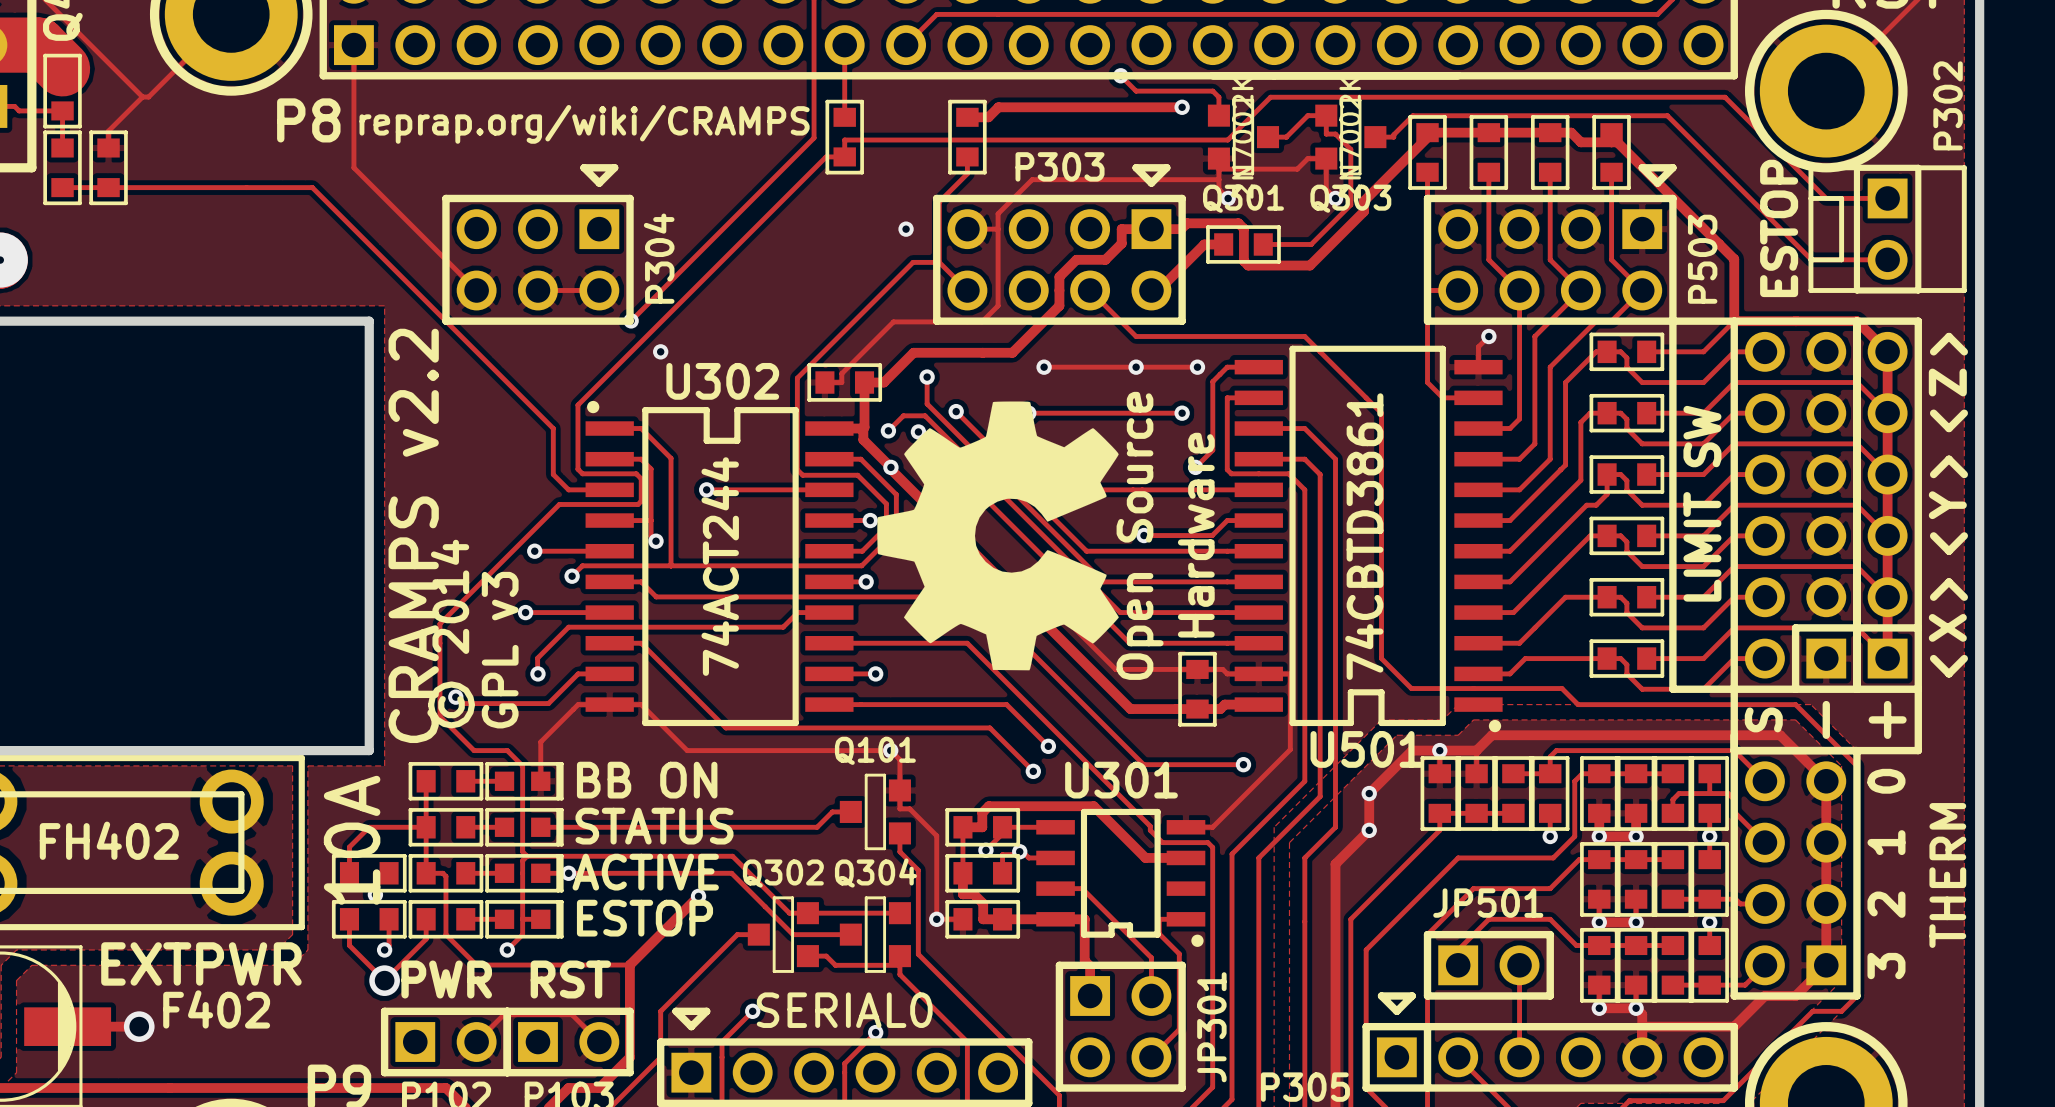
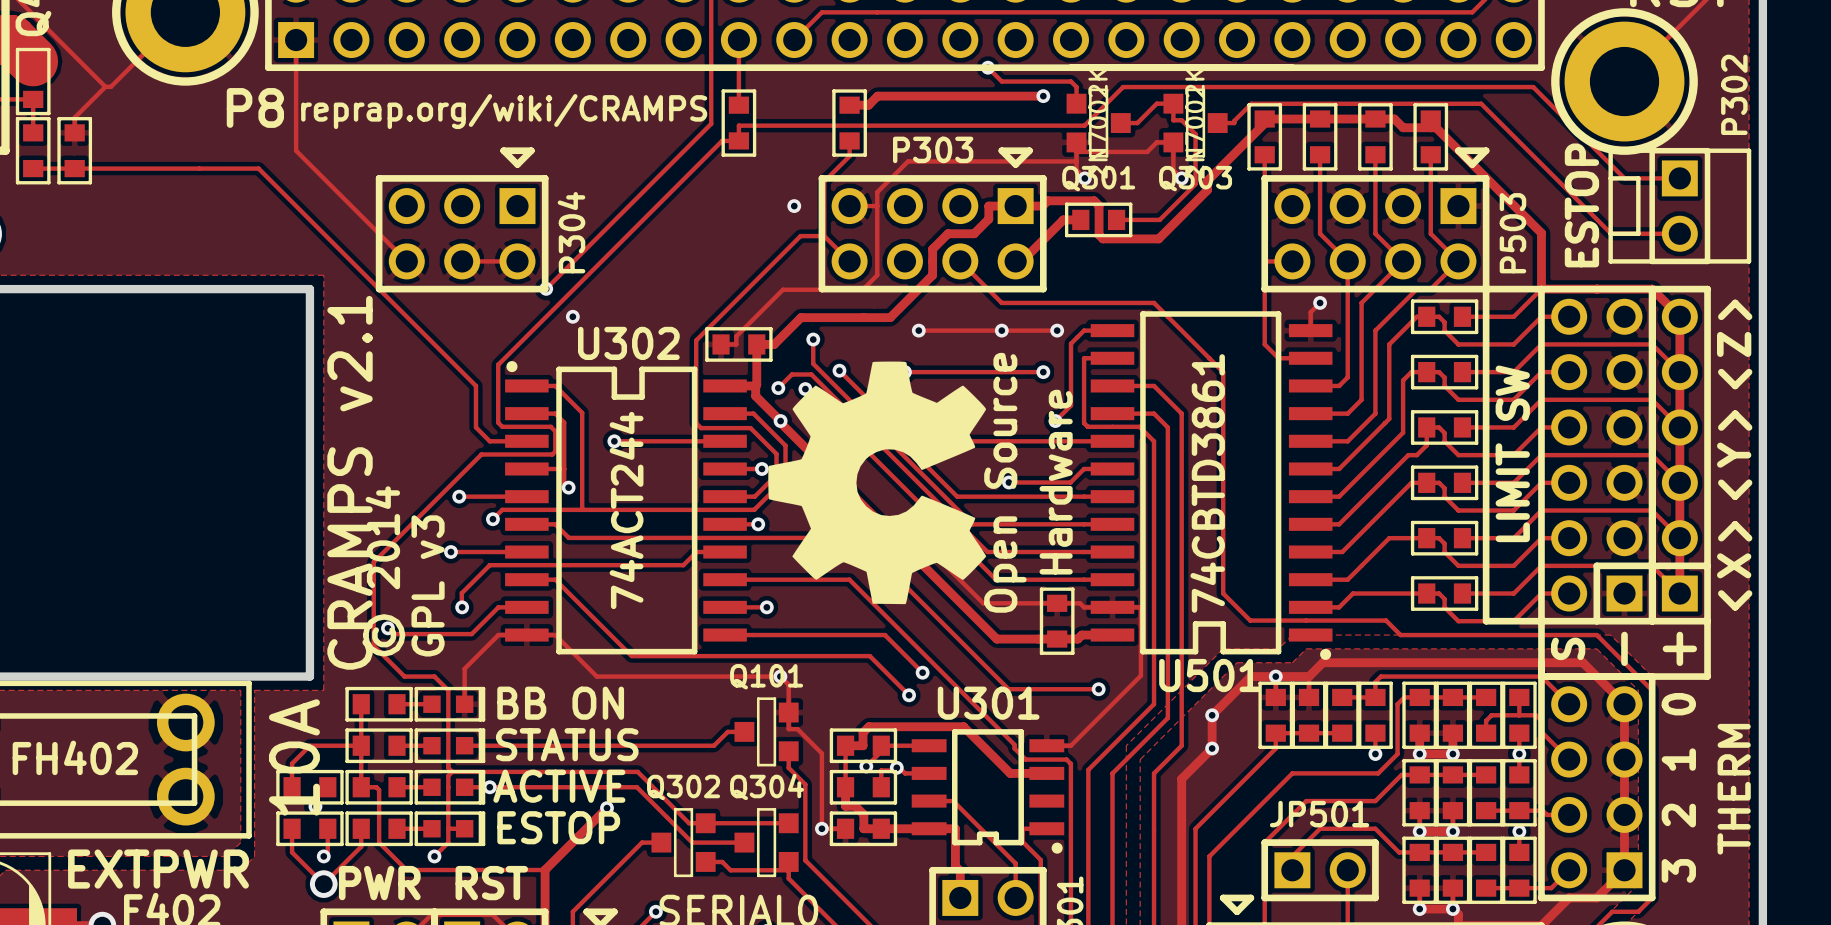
text: CRAMPS v2.2 (413, 535) -> CRAMPS v2.1 (350, 482)

